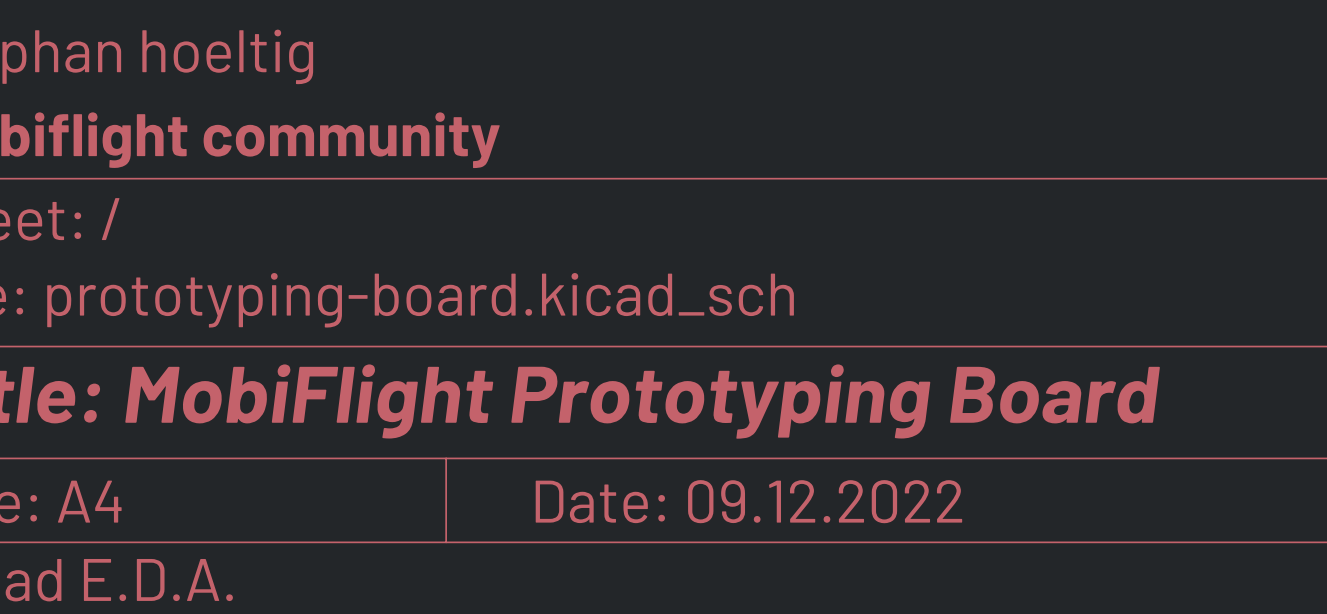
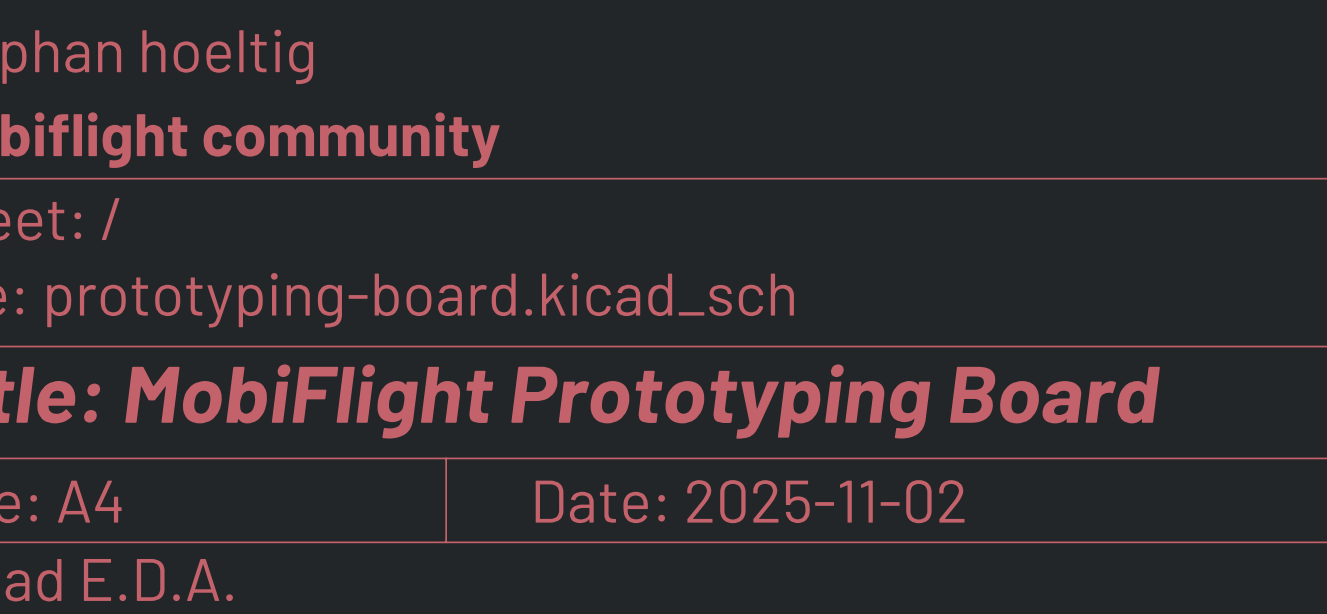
title block: Date: 09.12.2022 (748, 501) -> Date: 2025-11-02 (750, 501)

